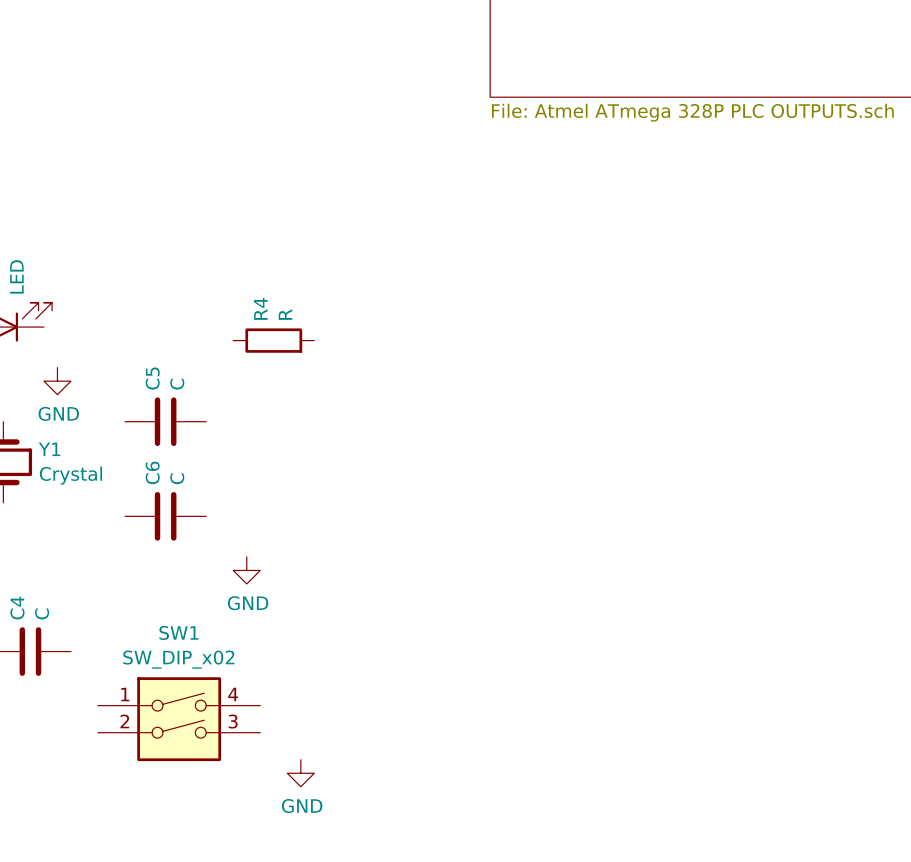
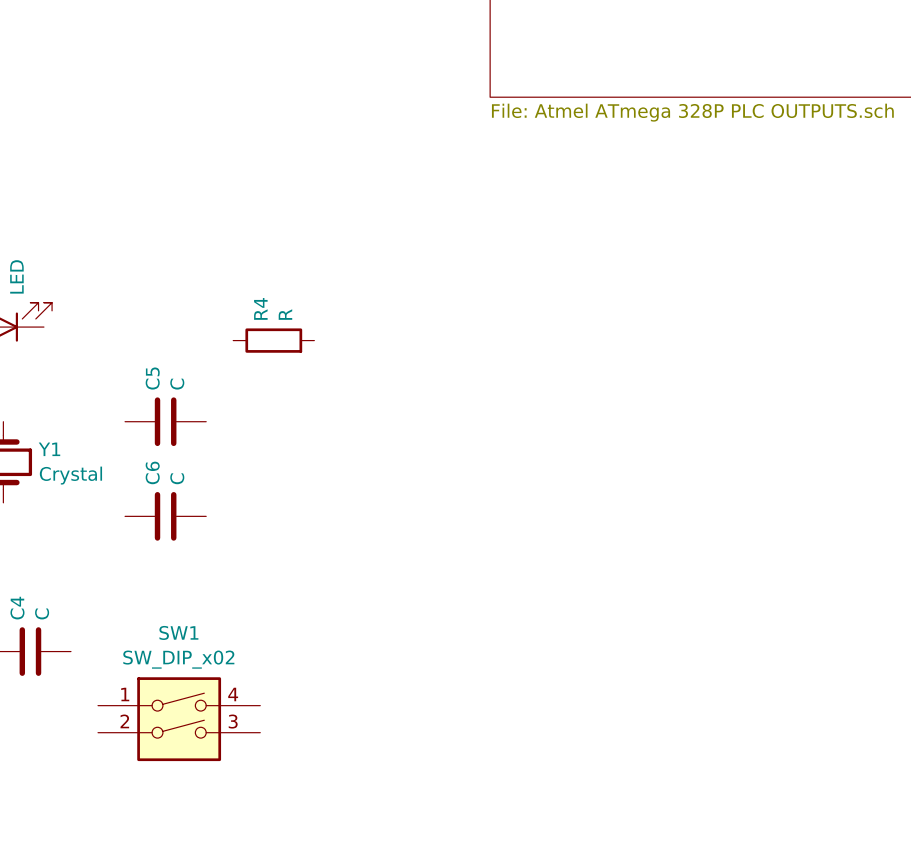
power symbol: GND (57, 381) -> none
power symbol: GND (246, 570) -> none
power symbol: GND (300, 773) -> none

